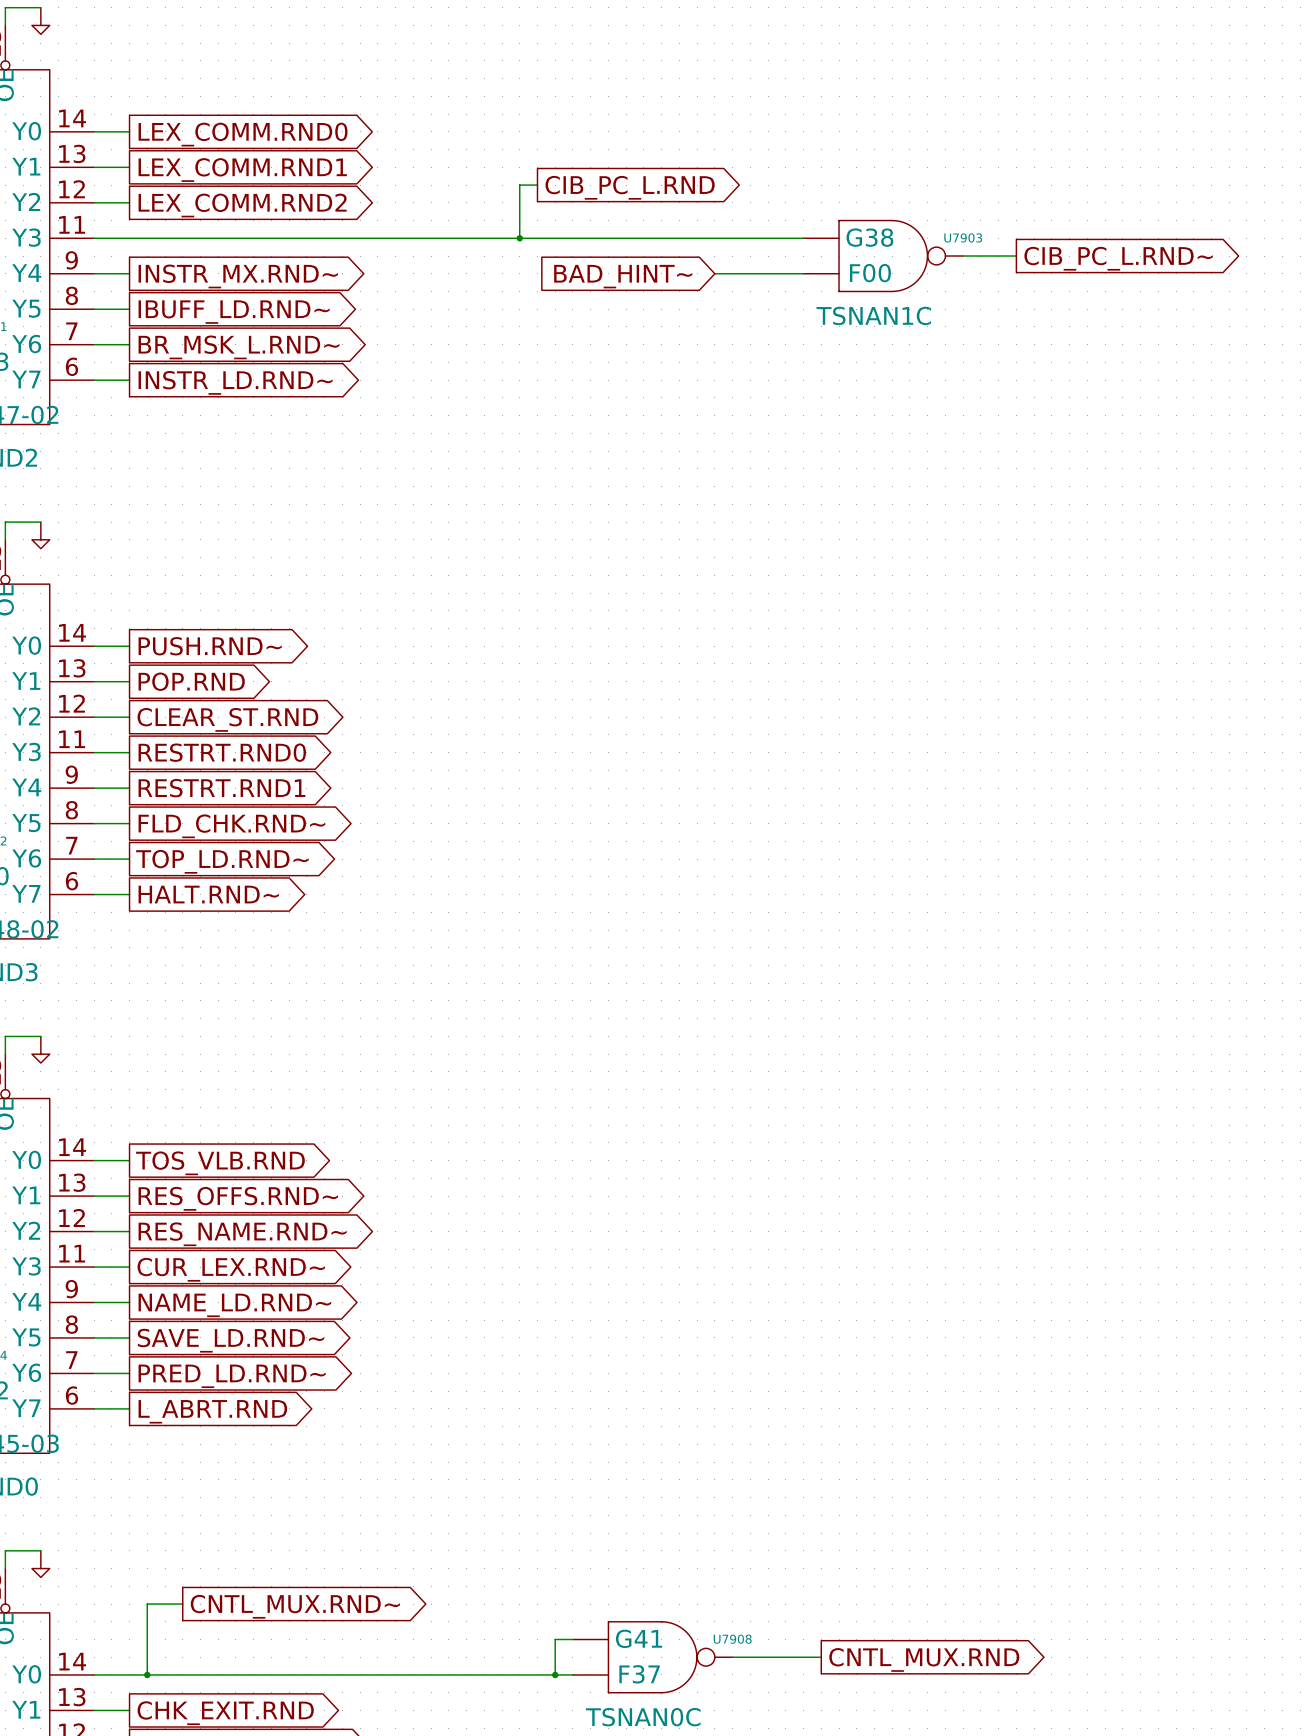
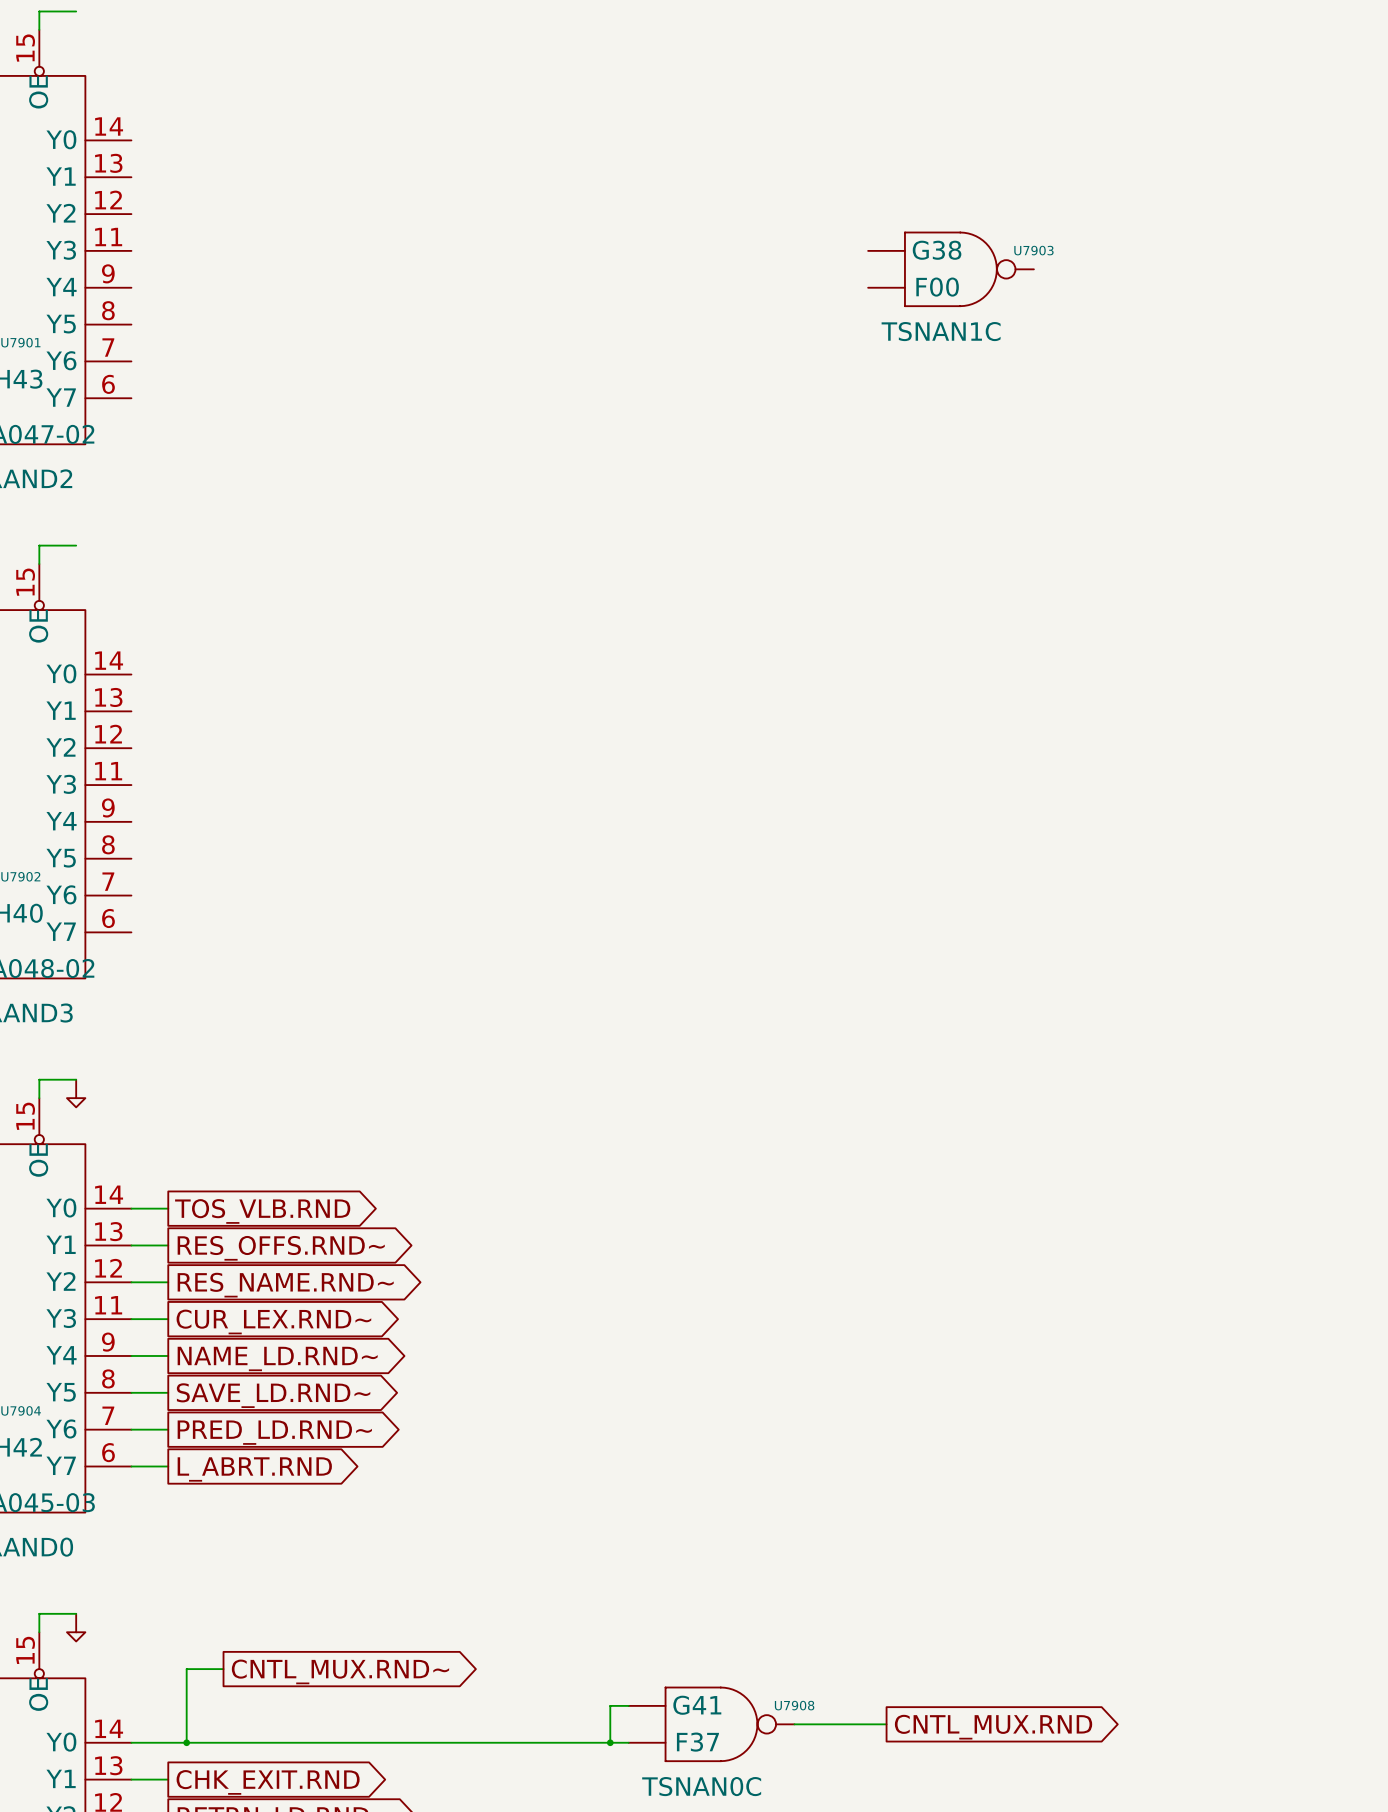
power symbol: (40, 21) -> none
wire: (94, 131) (129, 131) -> none
global label: LEX_COMM.RND0 (243, 134) -> none
wire: (94, 167) (129, 167) -> none
global label: LEX_COMM.RND1 (242, 170) -> none
wire: (537, 185) (519, 185) (519, 238) -> none
global label: CIB_PC_L.RND (630, 187) -> none
wire: (94, 202) (129, 202) -> none
global label: LEX_COMM.RND2 (242, 205) -> none
wire: (94, 238) (803, 238) -> none
junction: (519, 238) -> none
wire: (963, 256) (1016, 256) -> none
global label: CIB_PC_L.RND~ (1118, 258) -> none
wire: (94, 273) (129, 273) -> none
wire: (714, 273) (803, 273) -> none
global label: INSTR_MX.RND~ (238, 276) -> none
global label: BAD_HINT~ (623, 276) -> none
wire: (94, 309) (129, 309) -> none
global label: IBUFF_LD.RND~ (234, 312) -> none
wire: (94, 344) (129, 344) -> none
global label: BR_MSK_L.RND~ (238, 347) -> none
wire: (94, 380) (129, 380) -> none
global label: INSTR_LD.RND~ (235, 382) -> none
power symbol: (40, 535) -> none
wire: (94, 646) (129, 646) -> none
global label: PUSH.RND~ (210, 646) -> none
wire: (94, 681) (129, 681) -> none
global label: POP.RND (191, 681) -> none
wire: (94, 717) (129, 717) -> none
global label: CLEAR_ST.RND (227, 719) -> none
wire: (94, 752) (129, 752) -> none
global label: RESTRT.RND0 (222, 752) -> none
wire: (94, 788) (129, 788) -> none
global label: RESTRT.RND1 (221, 788) -> none
wire: (94, 823) (129, 823) -> none
global label: FLD_CHK.RND~ (231, 826) -> none
wire: (94, 859) (129, 859) -> none
global label: TOP_LD.RND~ (222, 861) -> none
wire: (94, 894) (129, 894) -> none
global label: HALT.RND~ (208, 894) -> none

